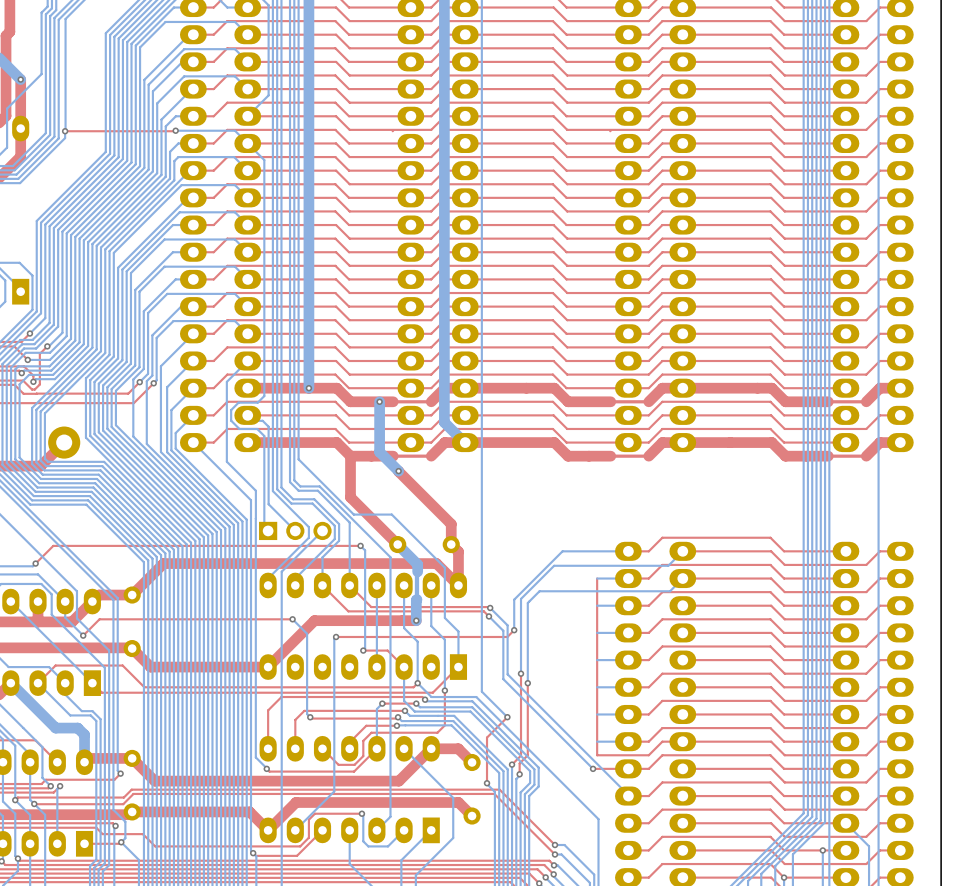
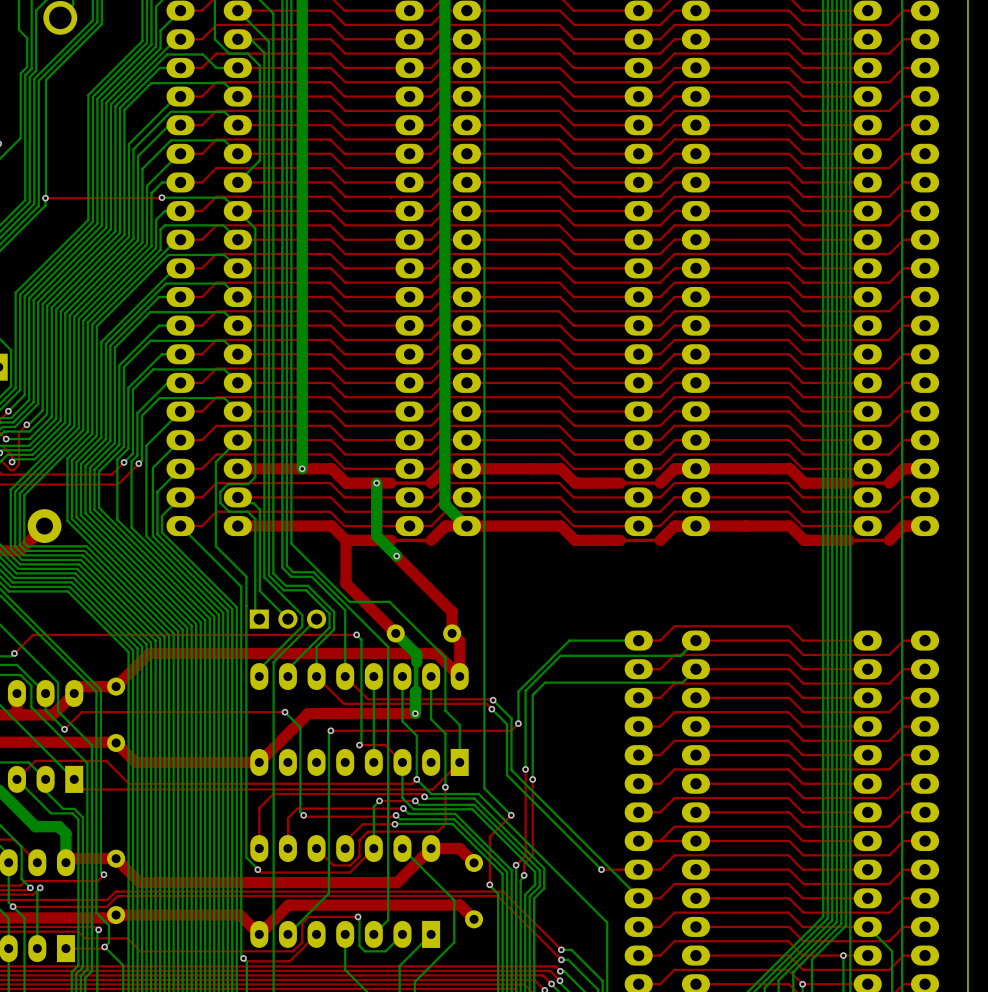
top track: (597, 578) (597, 755) (648, 755) (662, 741) -> (660, 841) (674, 841)
bottom track: (628, 578) (597, 578) -> none
bottom track: (628, 605) (597, 605) -> none
bottom track: (628, 632) (597, 632) -> none
bottom track: (628, 660) (597, 660) -> none
bottom track: (628, 687) (597, 687) -> none
bottom track: (628, 714) (597, 714) -> none
bottom track: (628, 741) (597, 741) -> none

